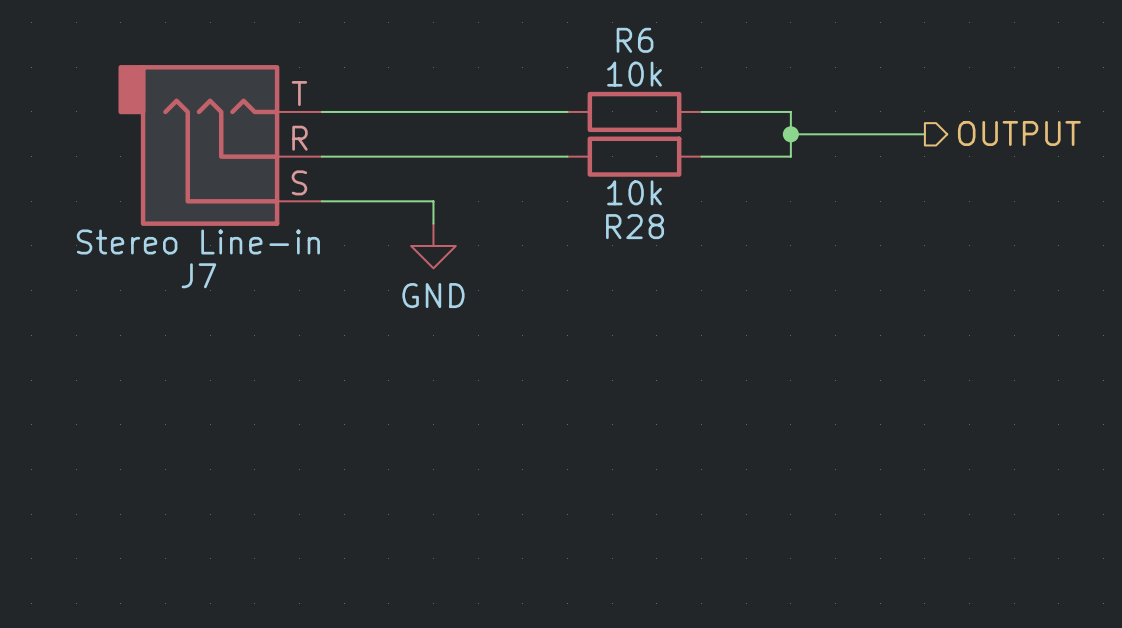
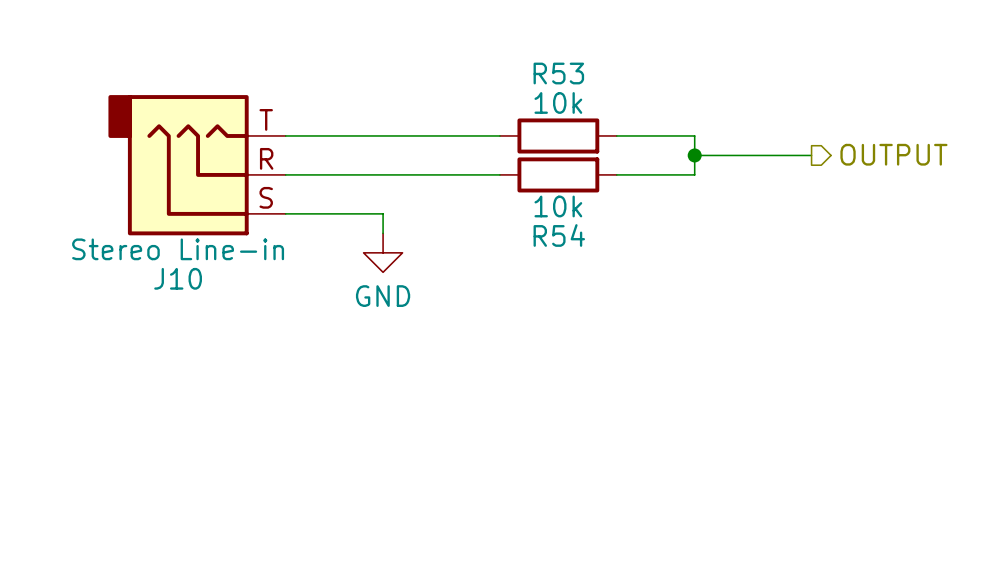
R6 name: R6 (635, 40) -> R53 (558, 73)
R28 name: R28 (635, 226) -> R54 (559, 235)
J7 name: J7 (198, 275) -> J10 (178, 278)

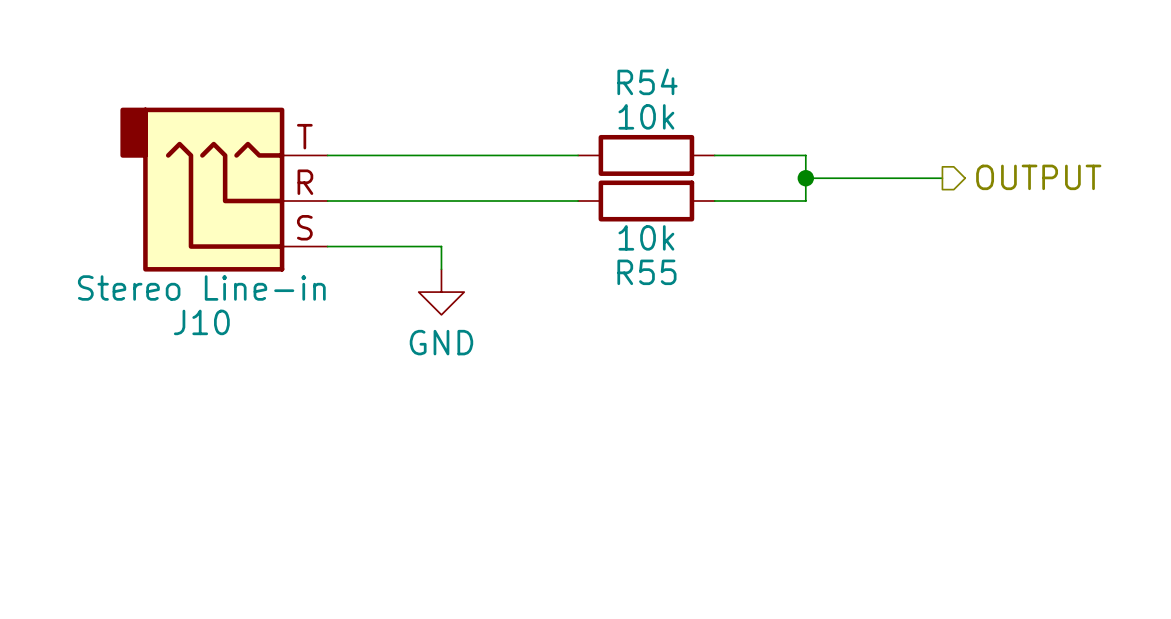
R53 name: R53 (558, 73) -> R54 (647, 81)
R54 name: R54 (559, 235) -> R55 (646, 272)

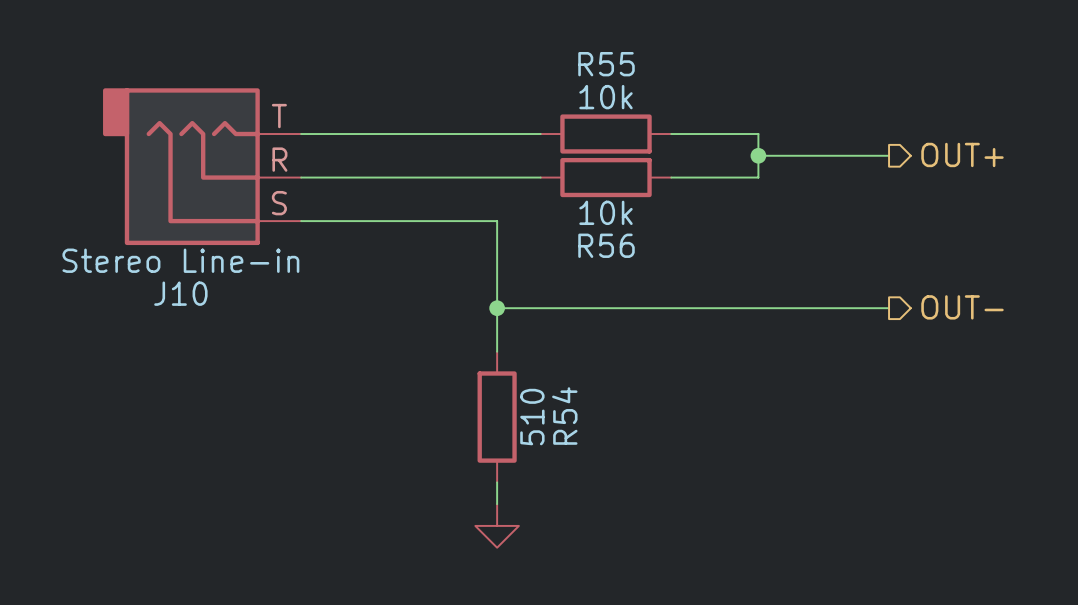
R54 name: R54 (647, 81) -> R55 (606, 64)
hierarchical label: OUTPUT (1038, 177) -> OUT+ (962, 154)
wire: (441, 246) (441, 269) -> (410, 221) (497, 221) (497, 351)
R55 name: R55 (646, 272) -> R56 (606, 245)
power symbol: GND (441, 292) -> none
hierarchical label: none -> OUT- (962, 307)
wire: none -> (497, 308) (889, 308)
junction: none -> (497, 308)
R54: none -> 510 (497, 417)
wire: none -> (497, 482) (497, 504)
power symbol: none -> (497, 525)

